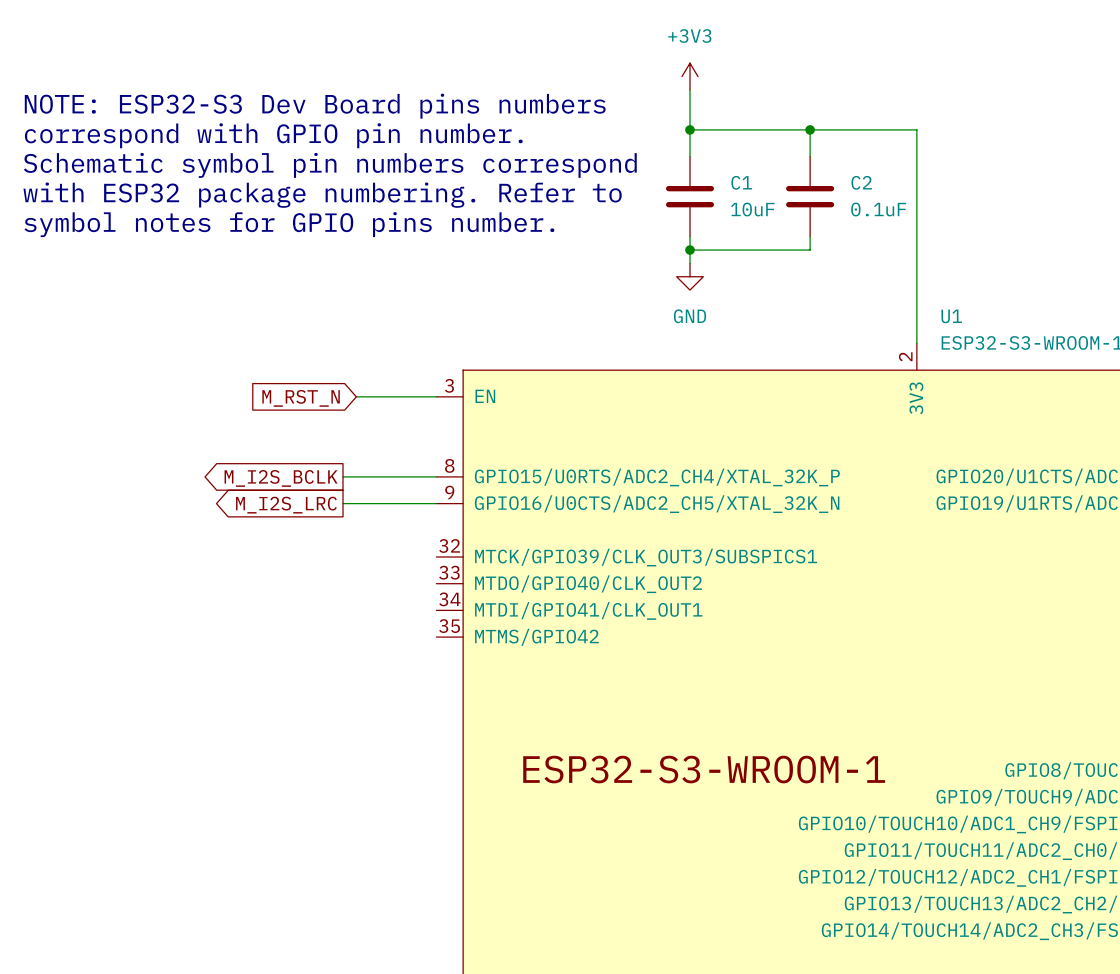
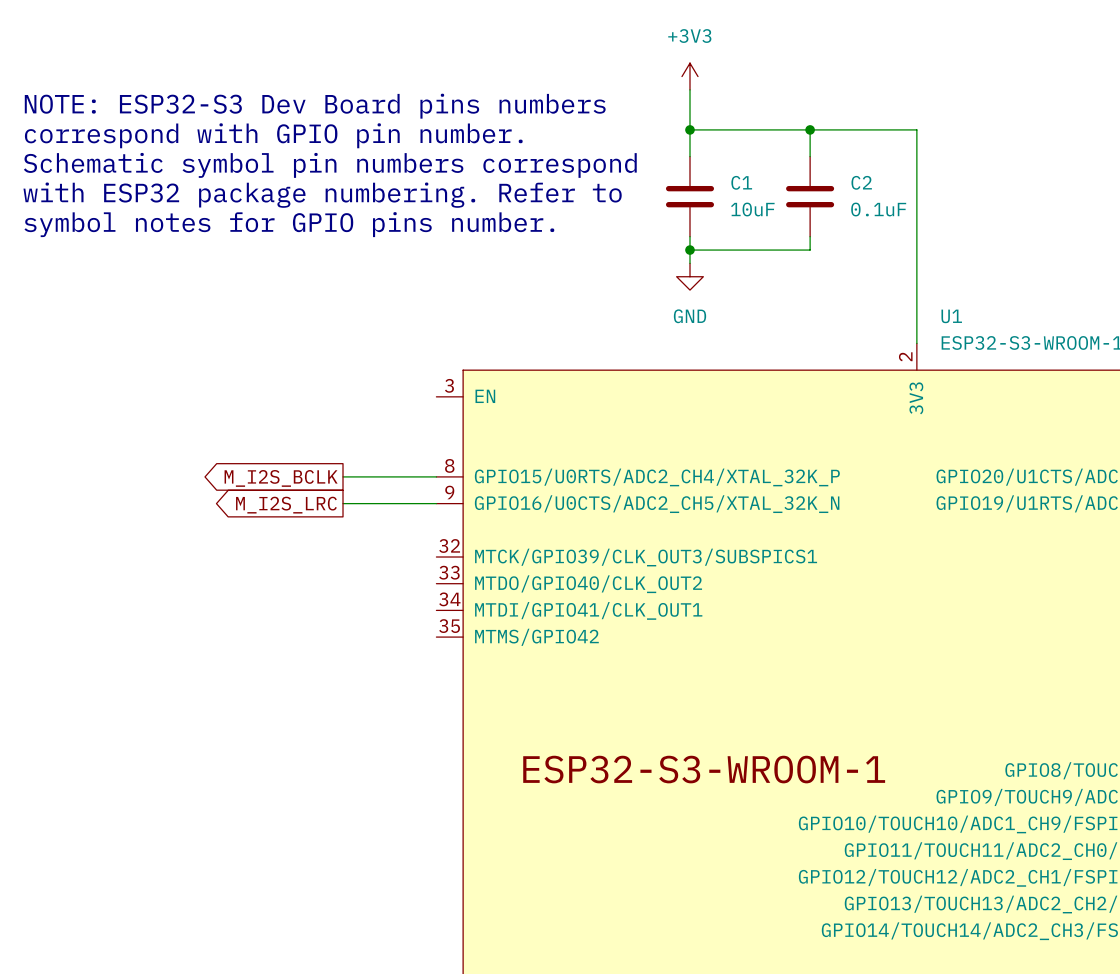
wire: (356, 396) (436, 396) -> none
global label: M_RST_N (301, 398) -> none

